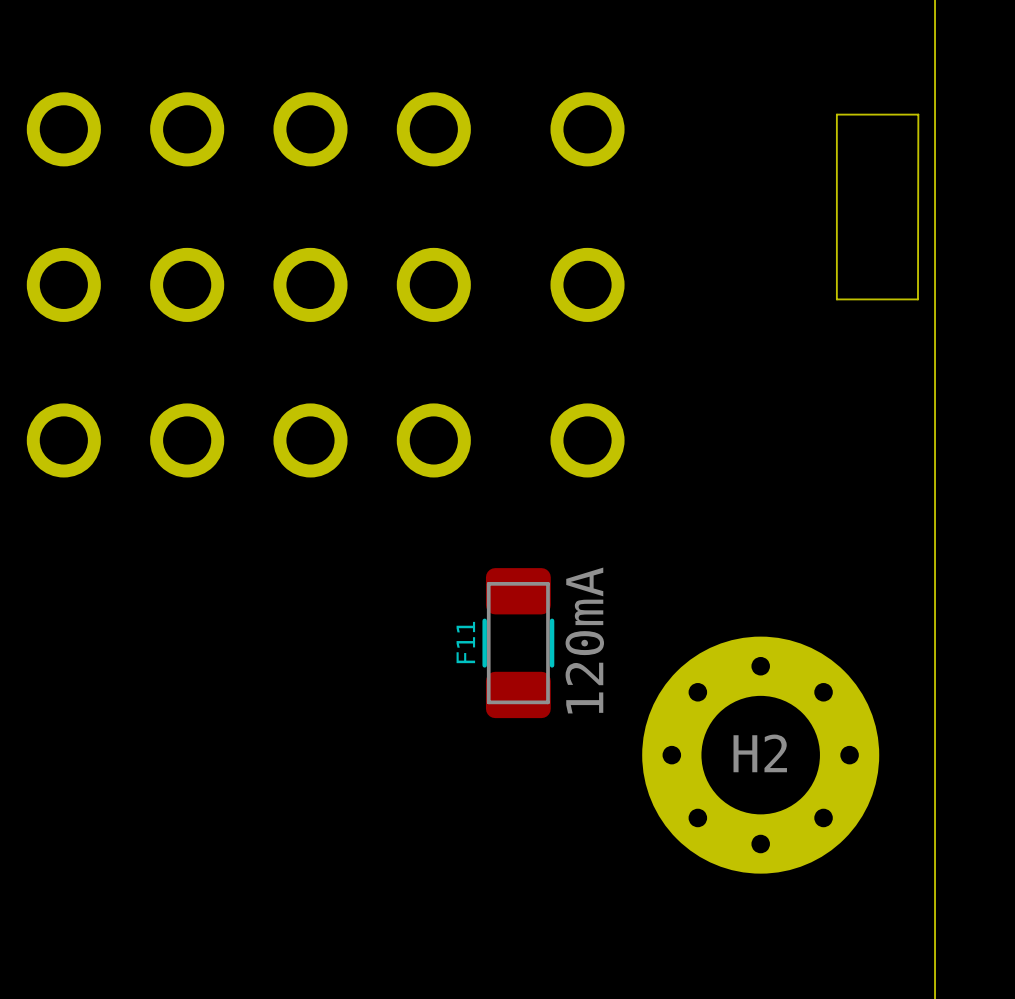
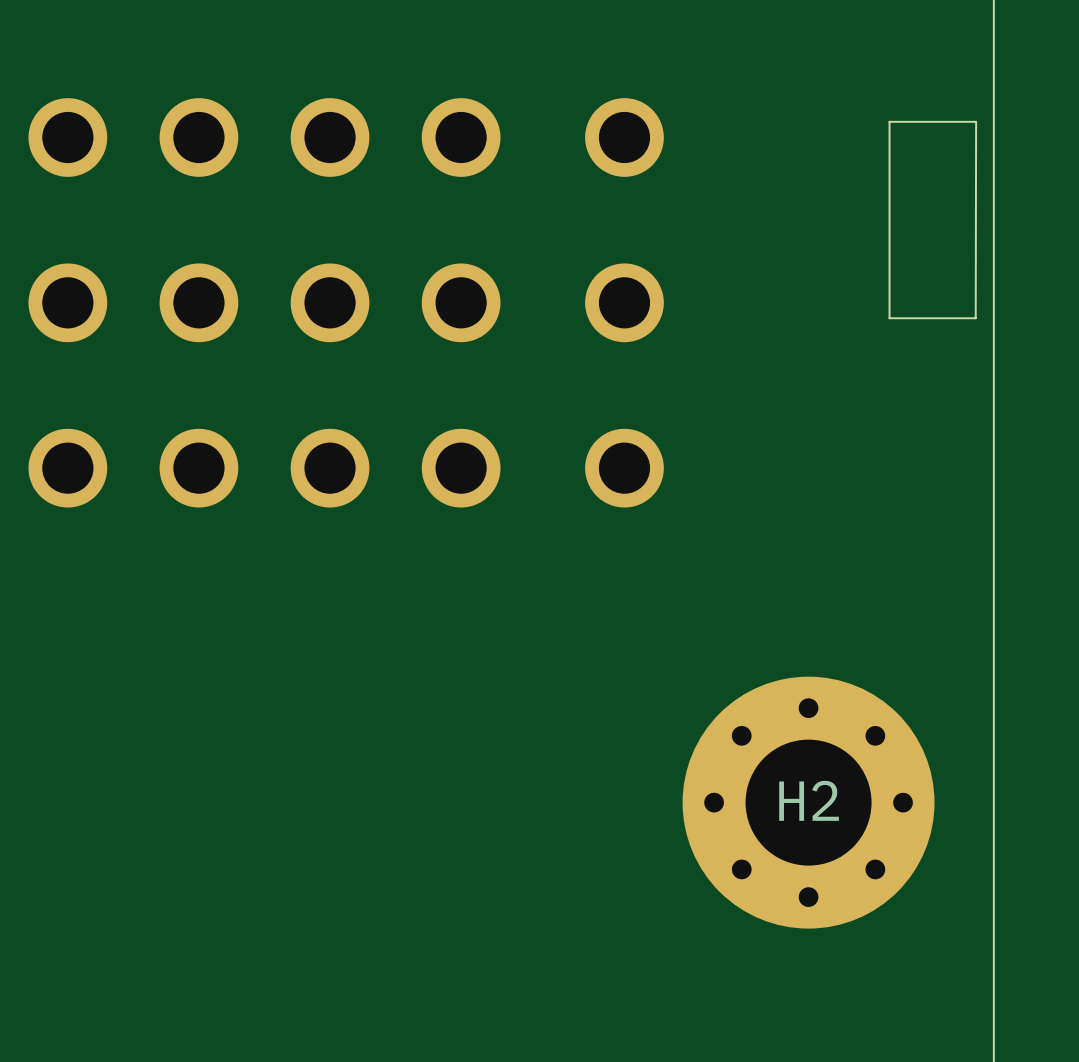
F11: 120mA (518, 643) -> none

